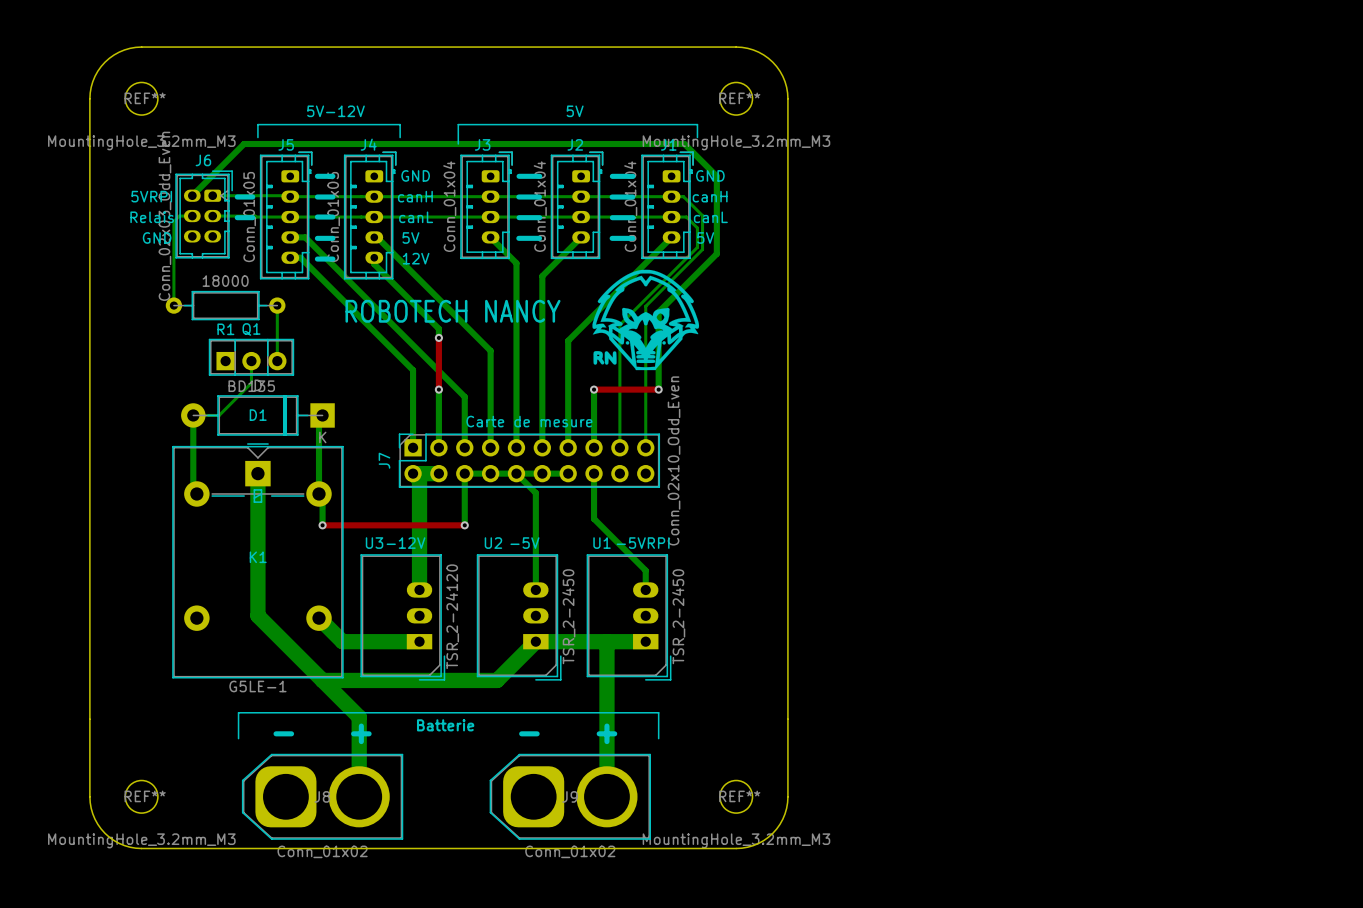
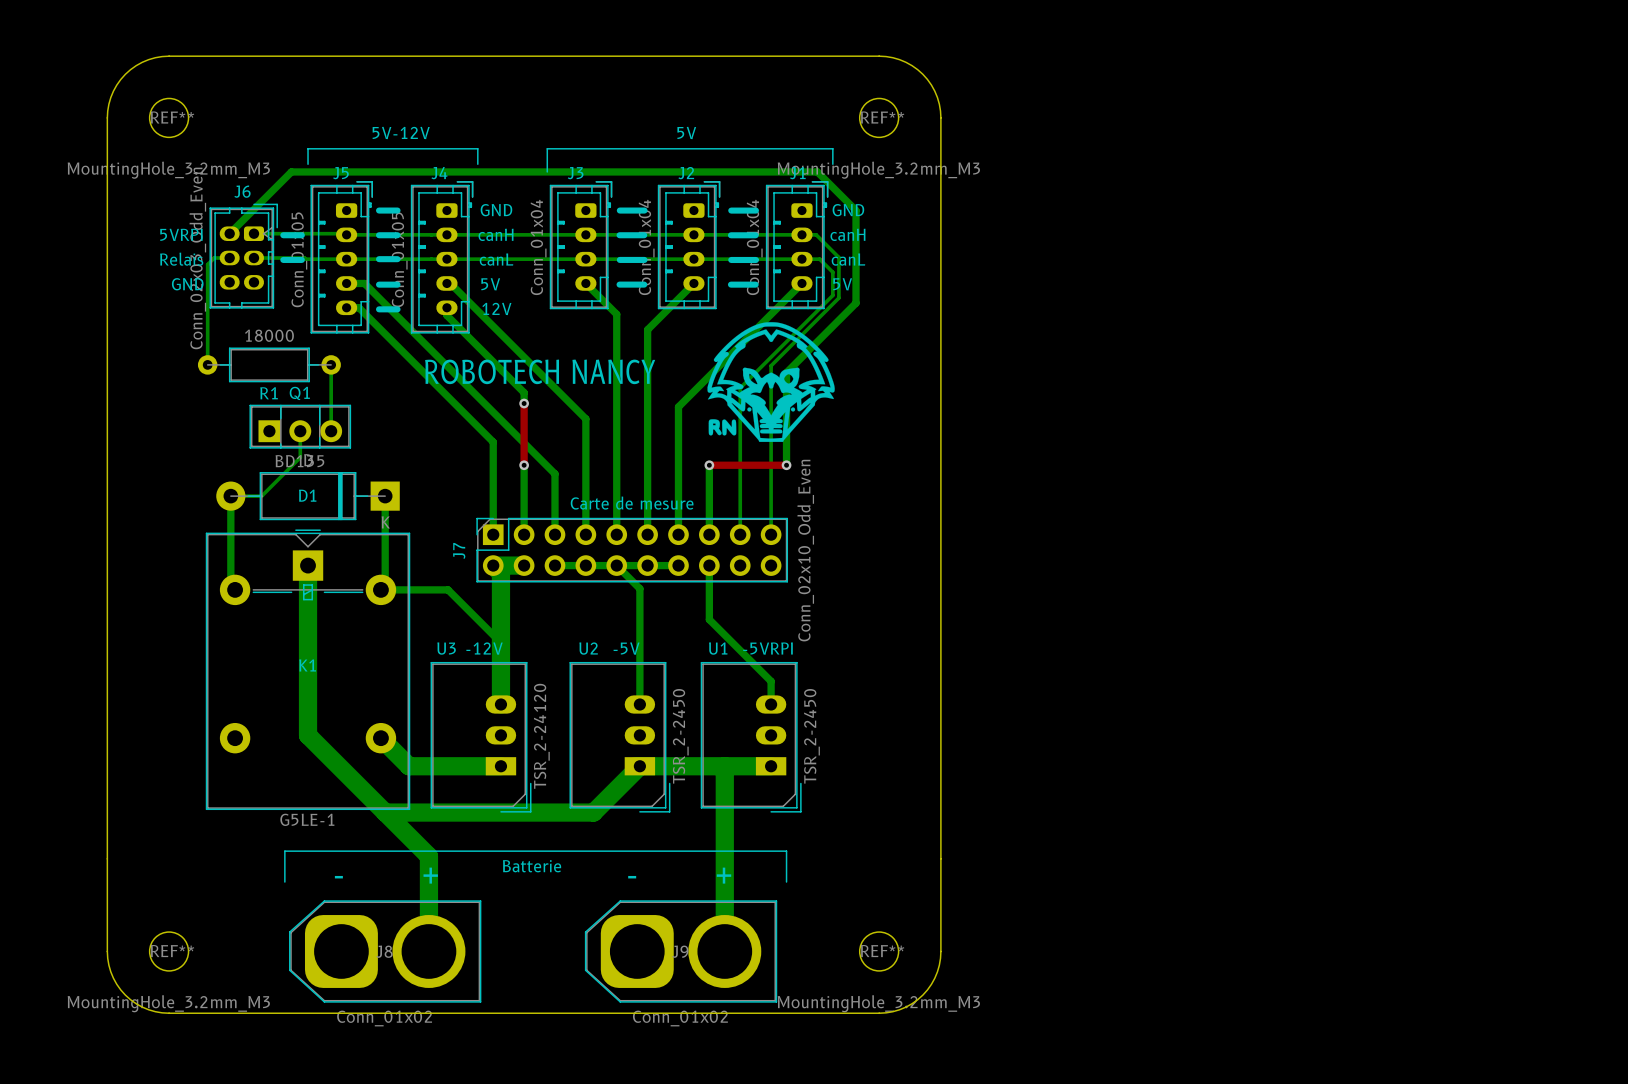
bottom track: (322, 415) (319, 419) (319, 493) -> (385, 496) (385, 585) (380, 589) (448, 589) (500, 642)
bottom track: (464, 473) (464, 525) -> none
bottom track: (322, 497) (322, 525) -> none
top track: (322, 525) (464, 525) -> none
via: (322, 525) -> none
via: (464, 525) -> none

